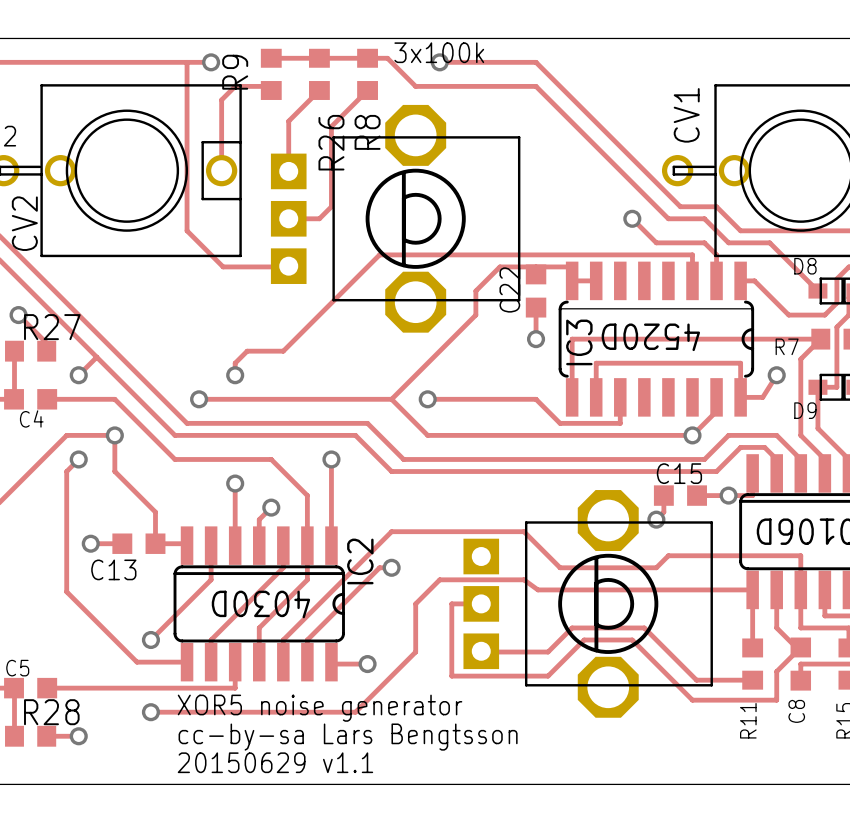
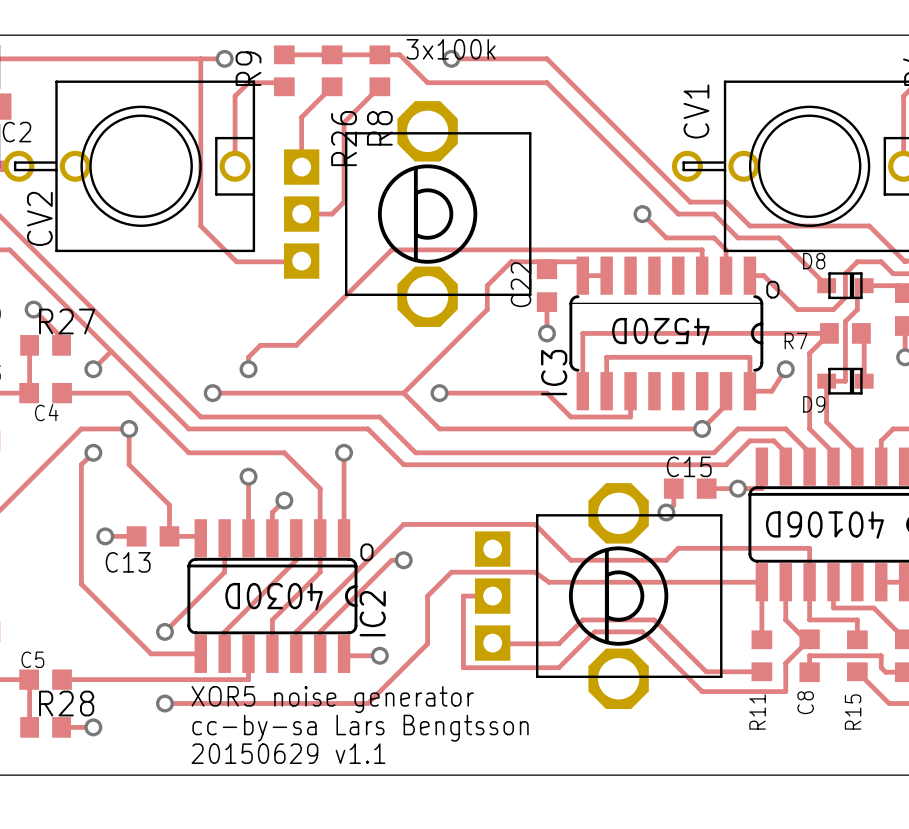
text: none -> o (772, 289)
IC3 name position: IC3 (579, 342) -> IC3 (554, 372)
text: none -> o (366, 552)
IC2 name position: IC2 (360, 561) -> IC2 (372, 613)

